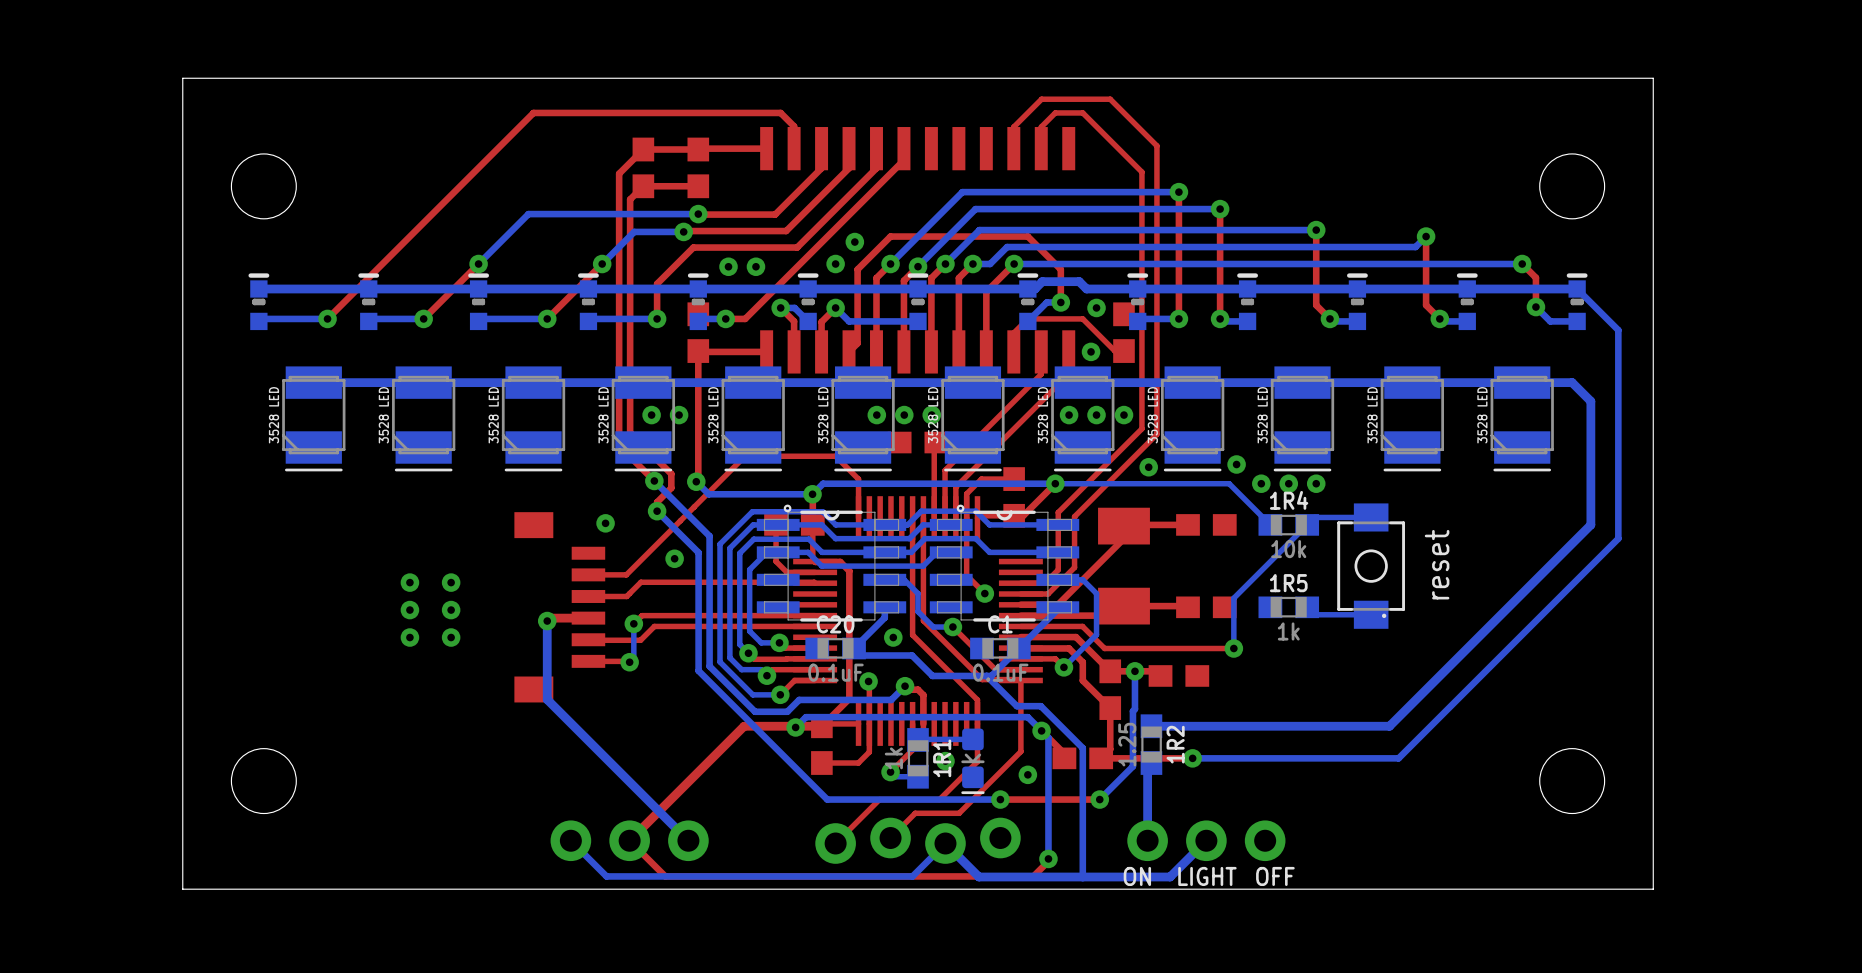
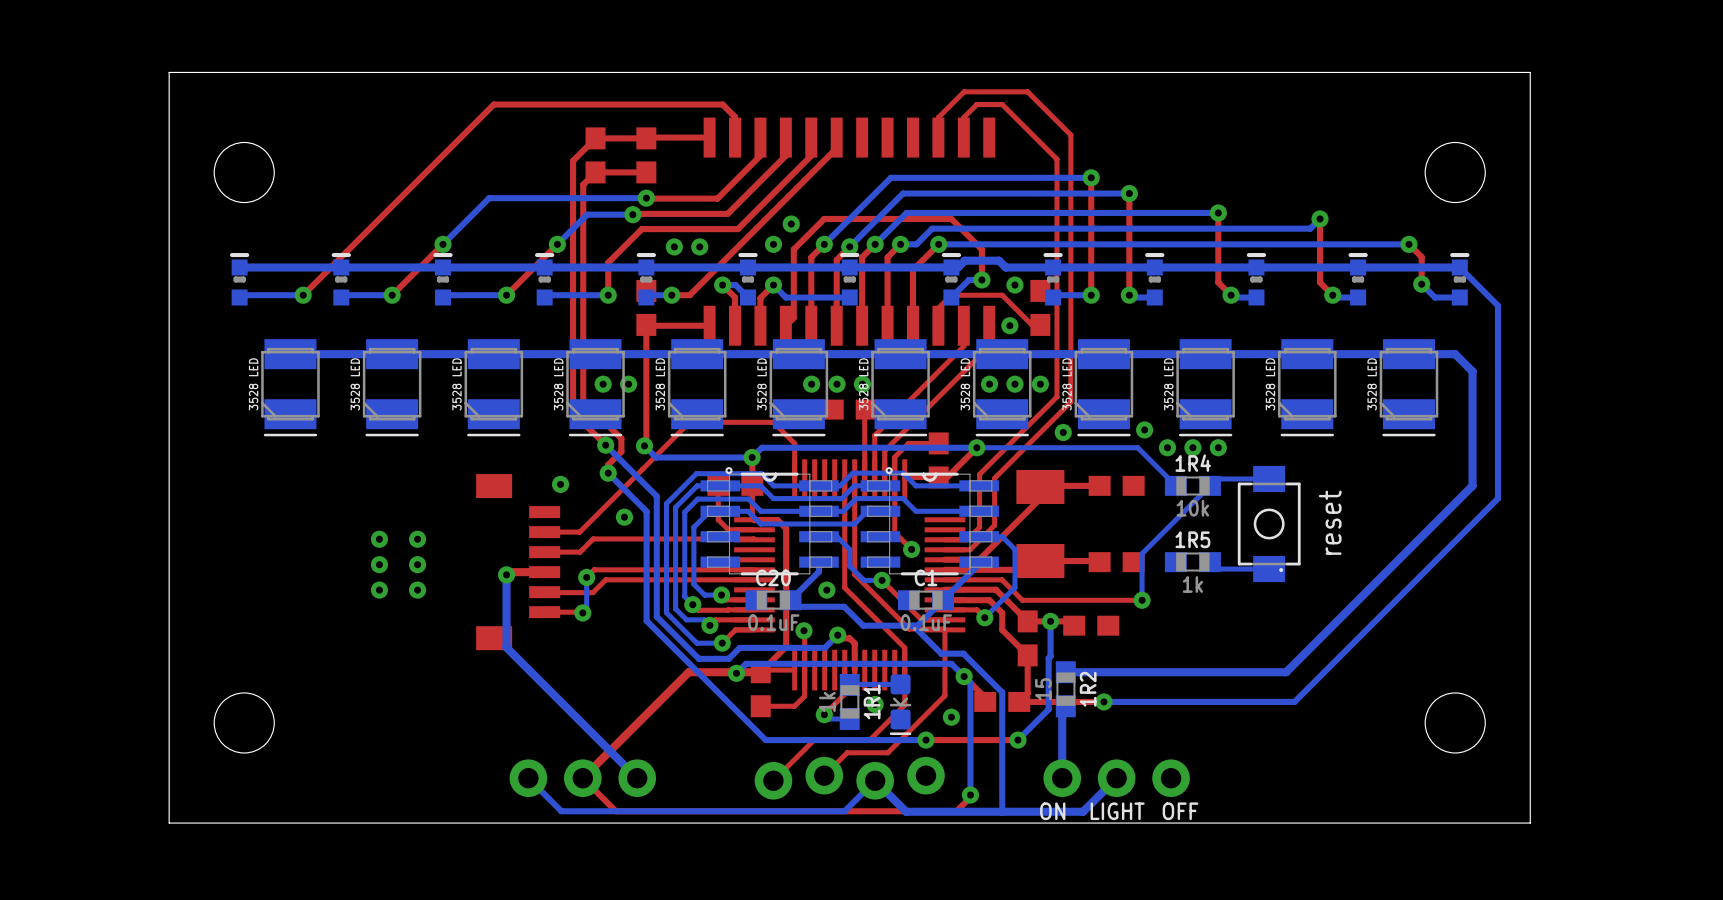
1R2 value: 1.25 (1127, 744) -> 15 (1043, 689)

